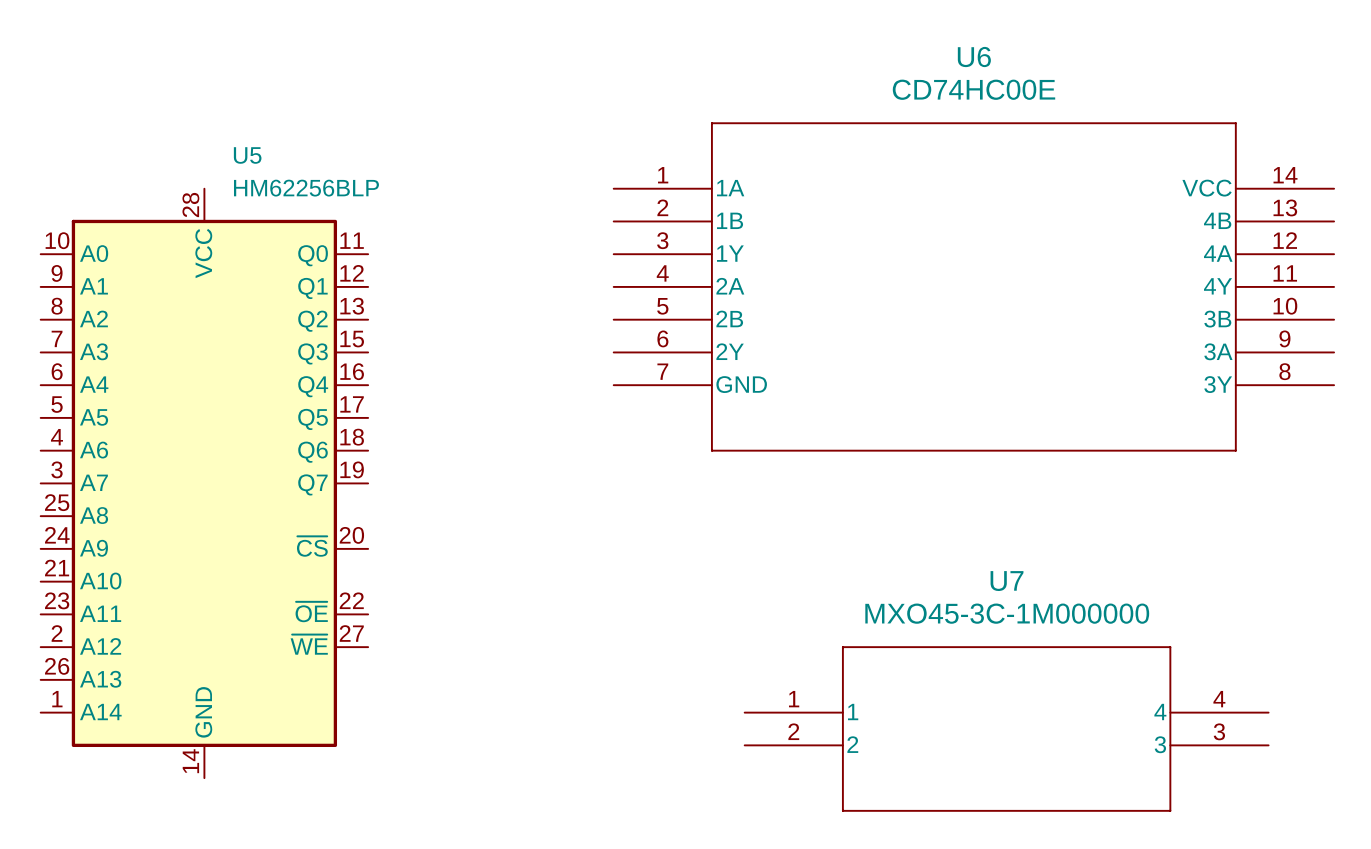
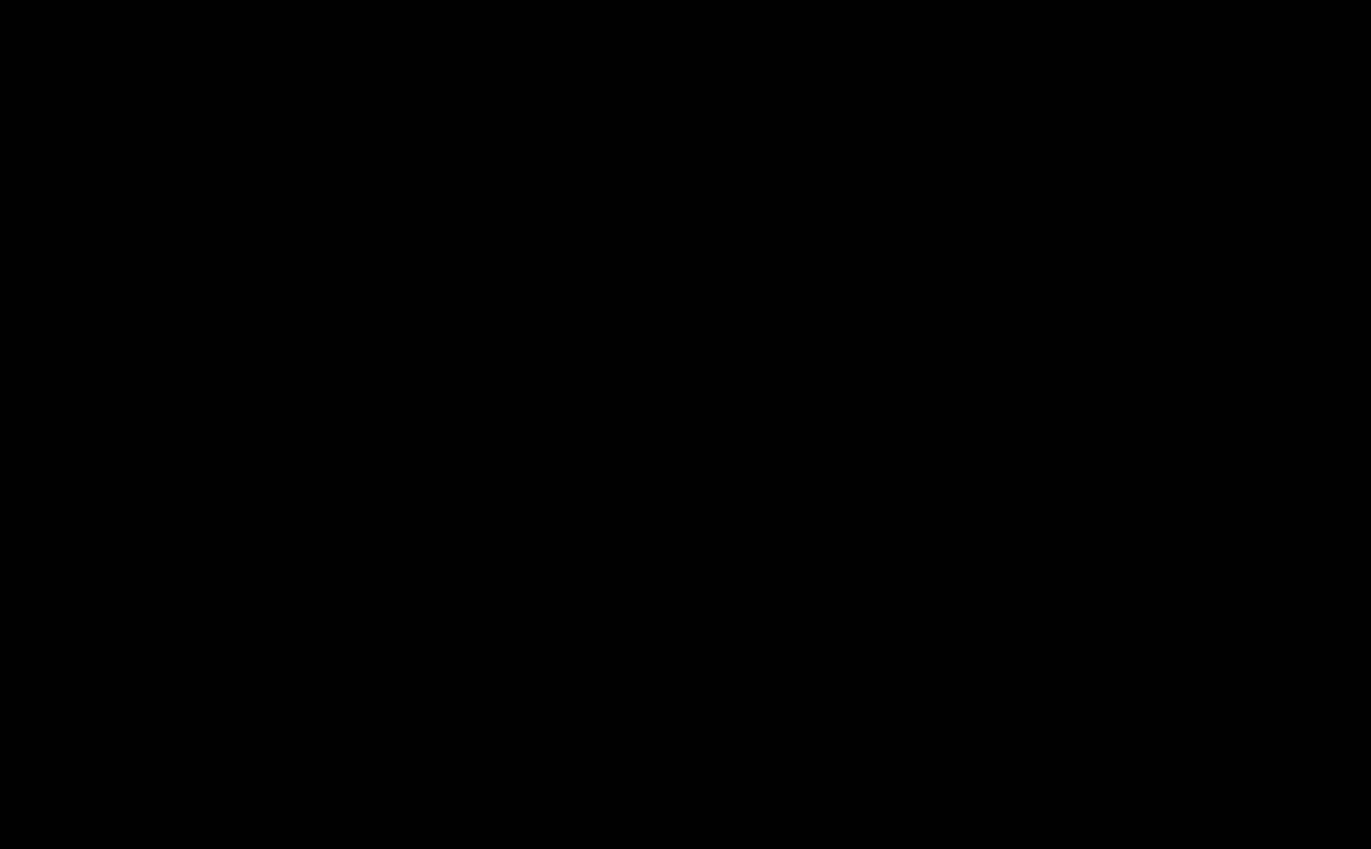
U6: CD74HC00E (973, 286) -> none
U5: HM62256BLP (204, 483) -> none
U7: MXO45-3C-1M000000 (1006, 728) -> none

